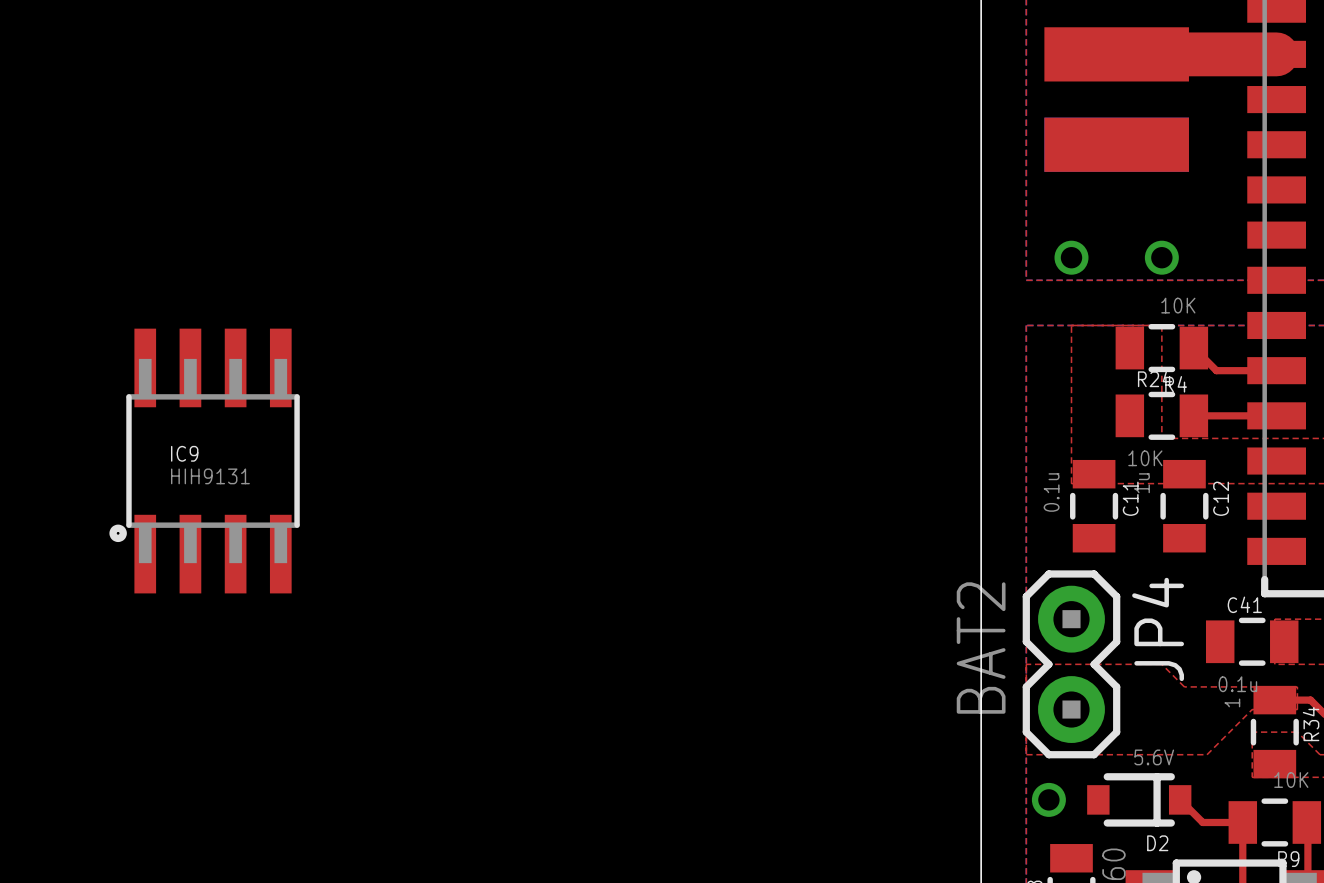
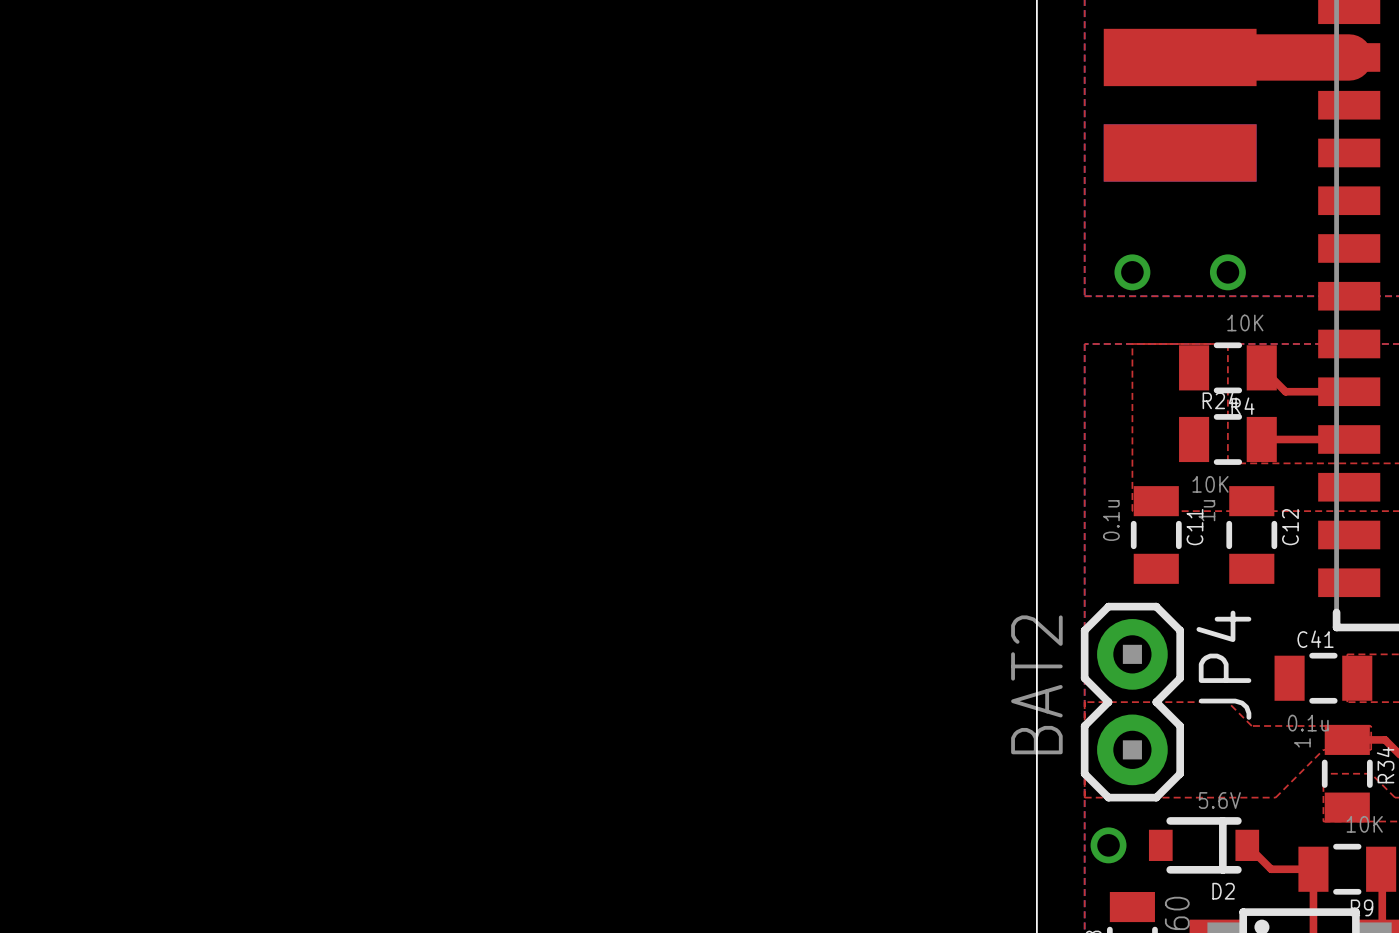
IC9: HIH9131 (204, 461) -> none

